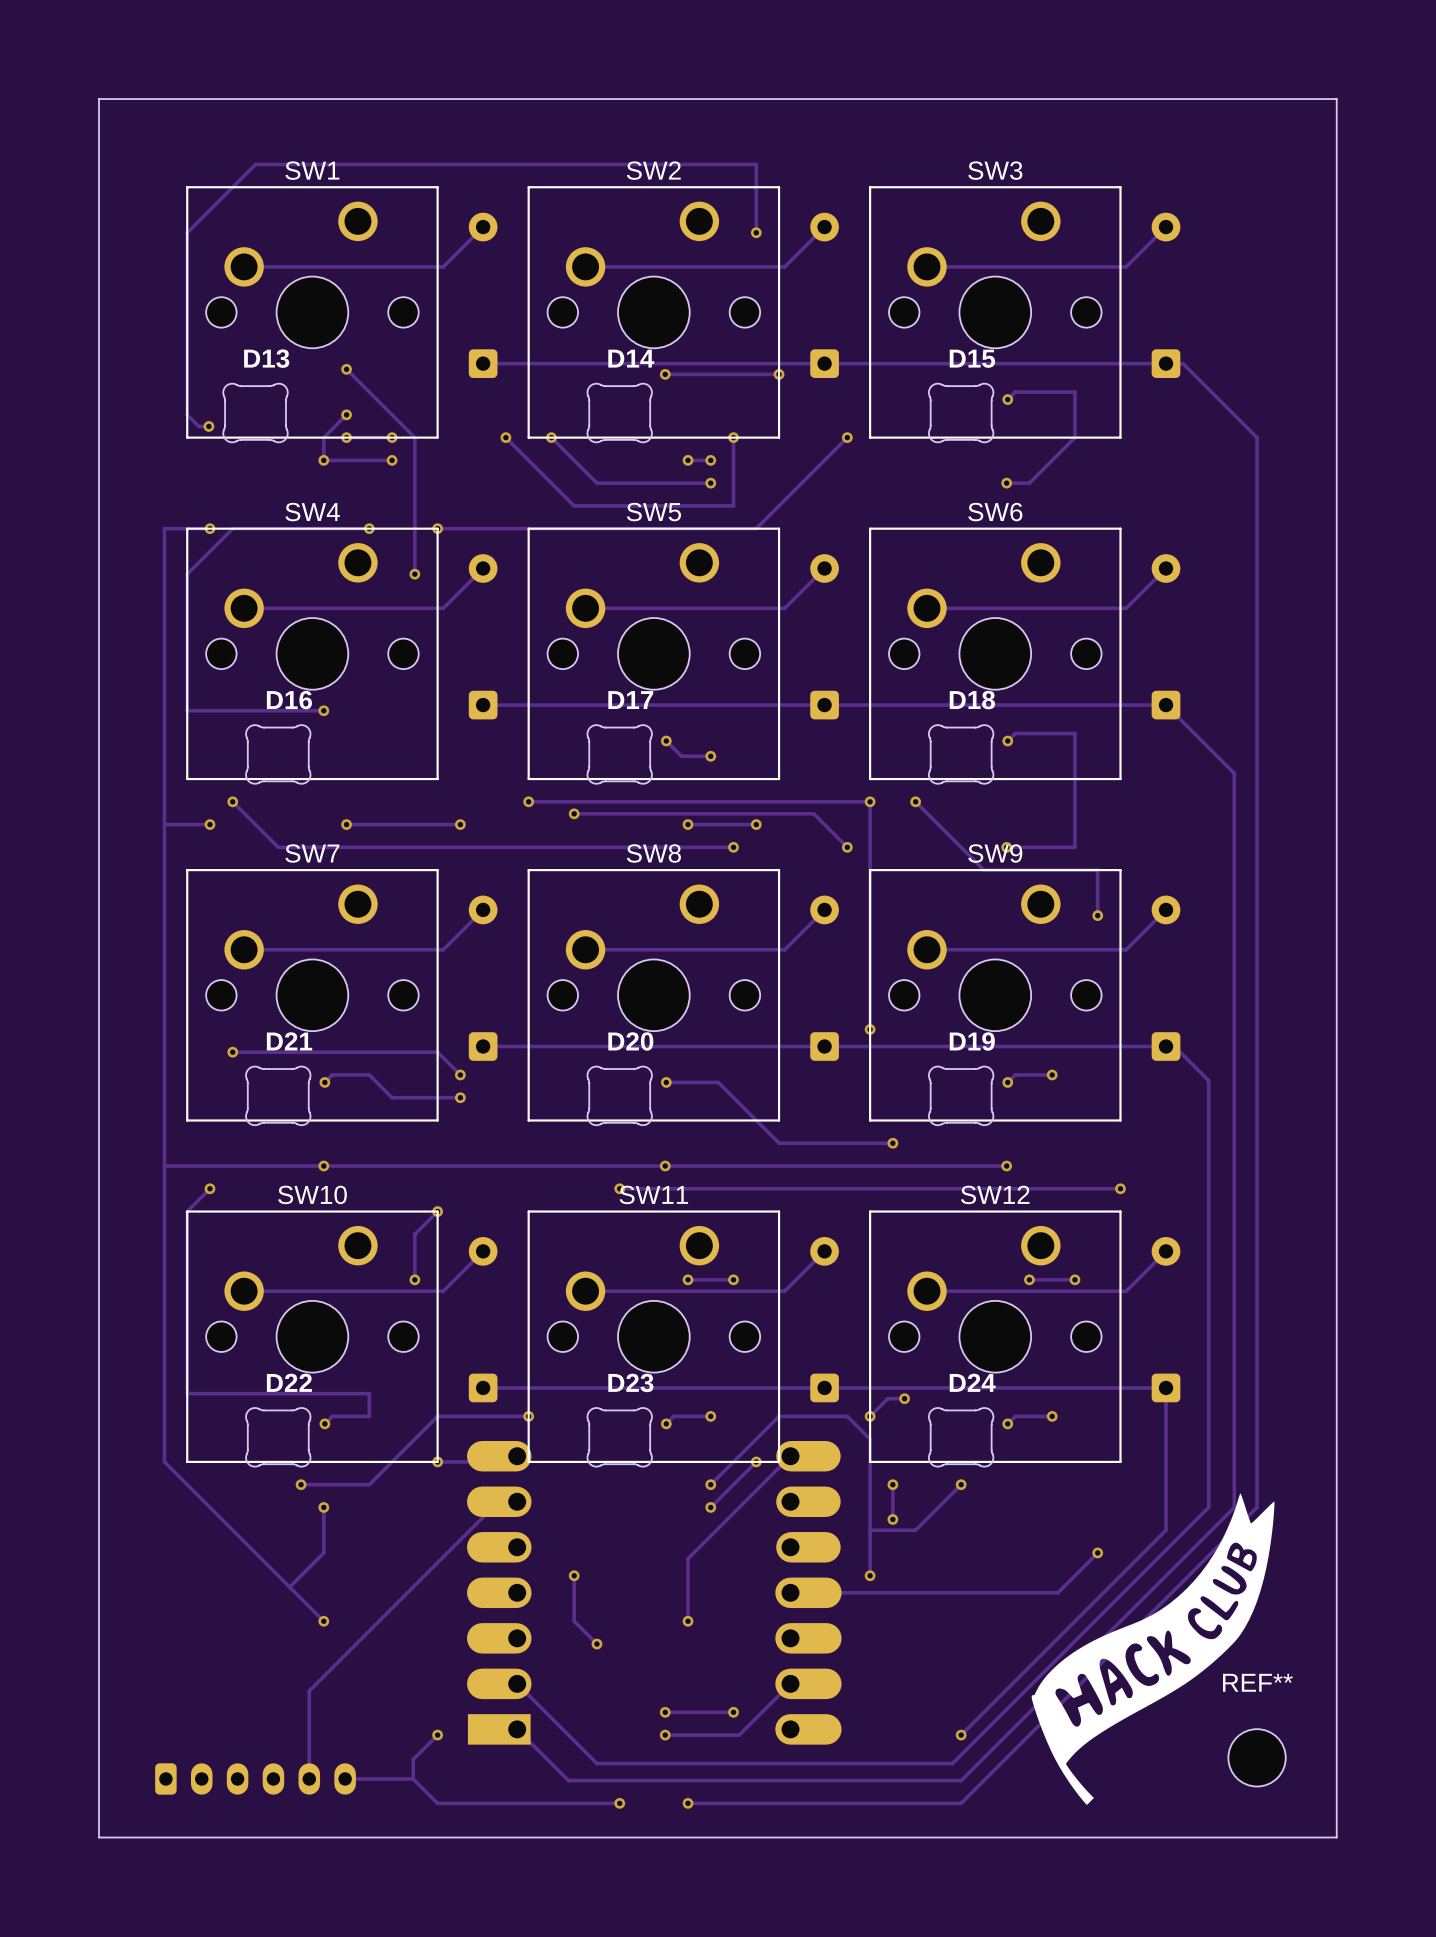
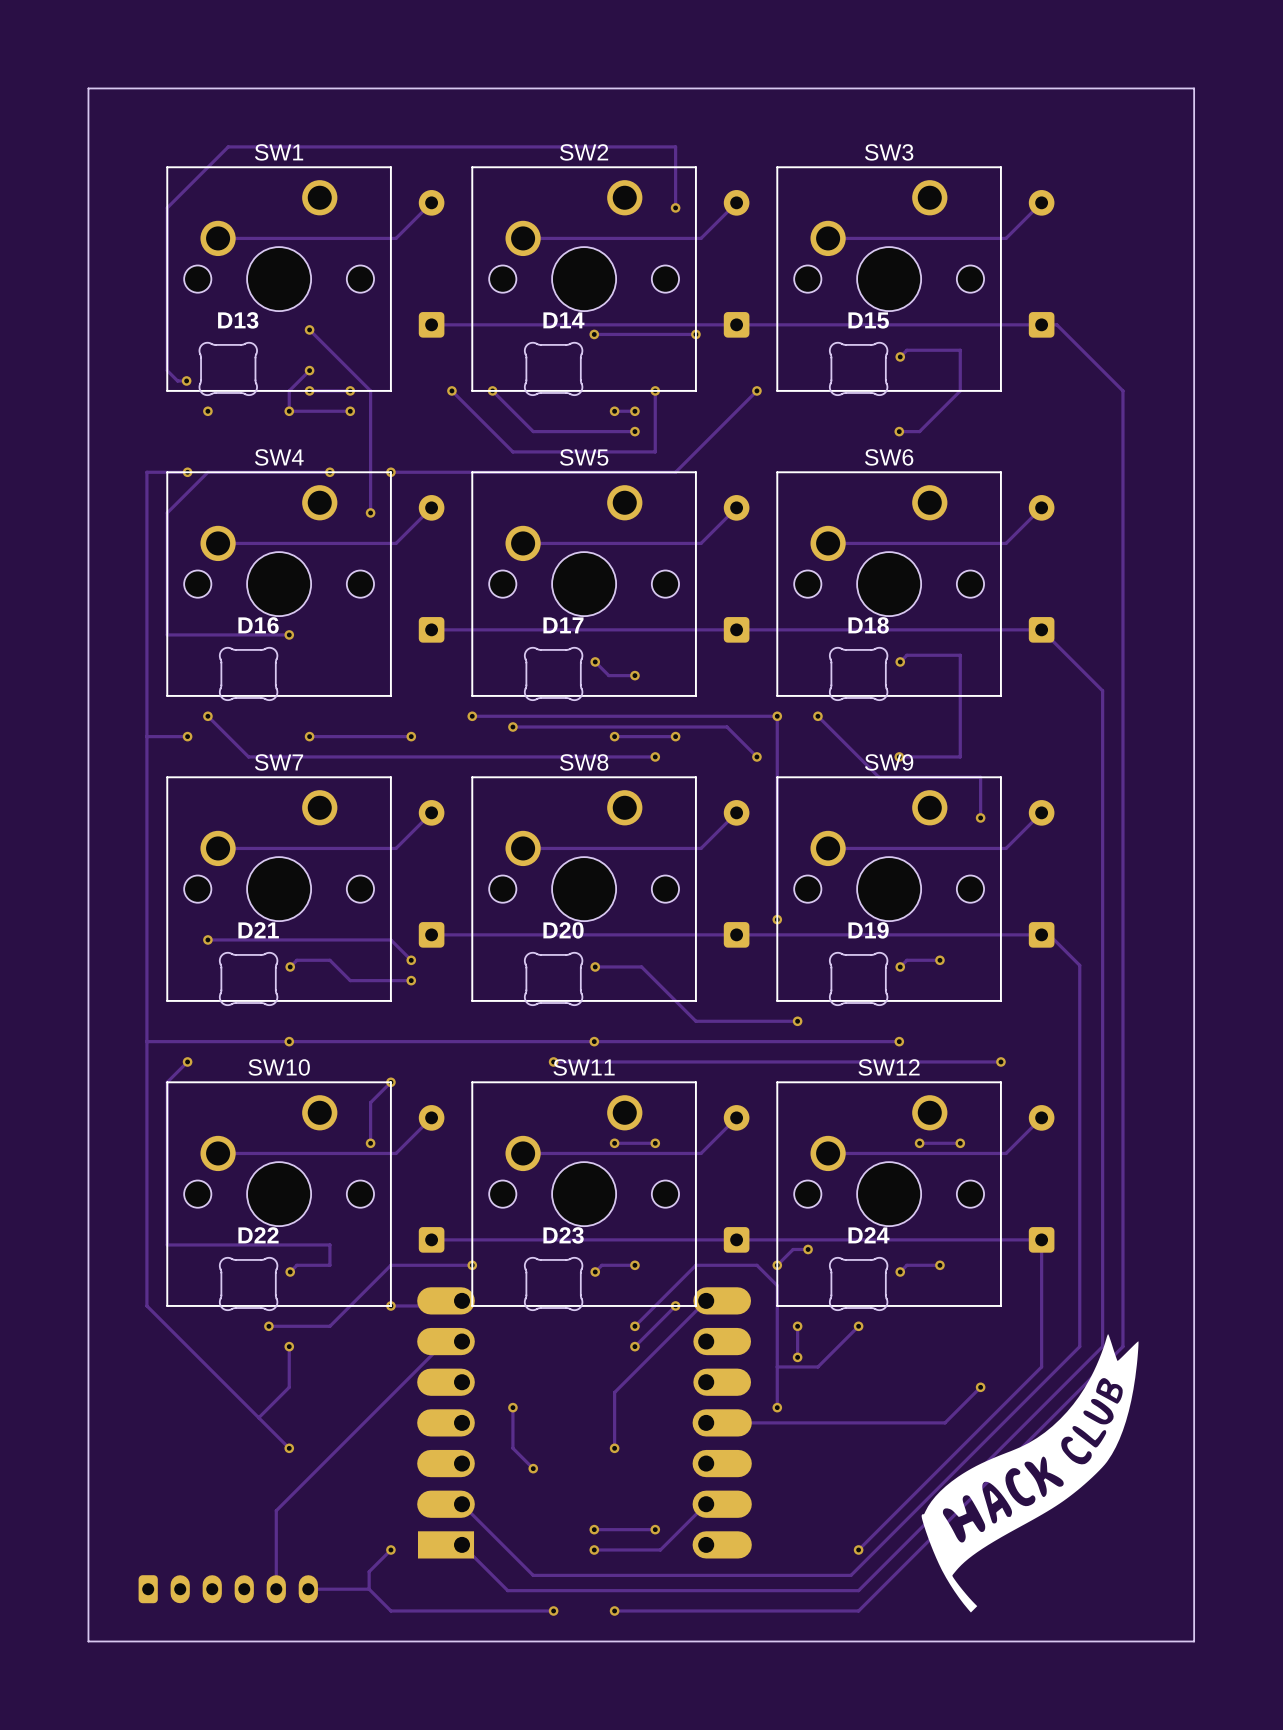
via: none -> (207, 411)
REF**: (1257, 1757) -> none

